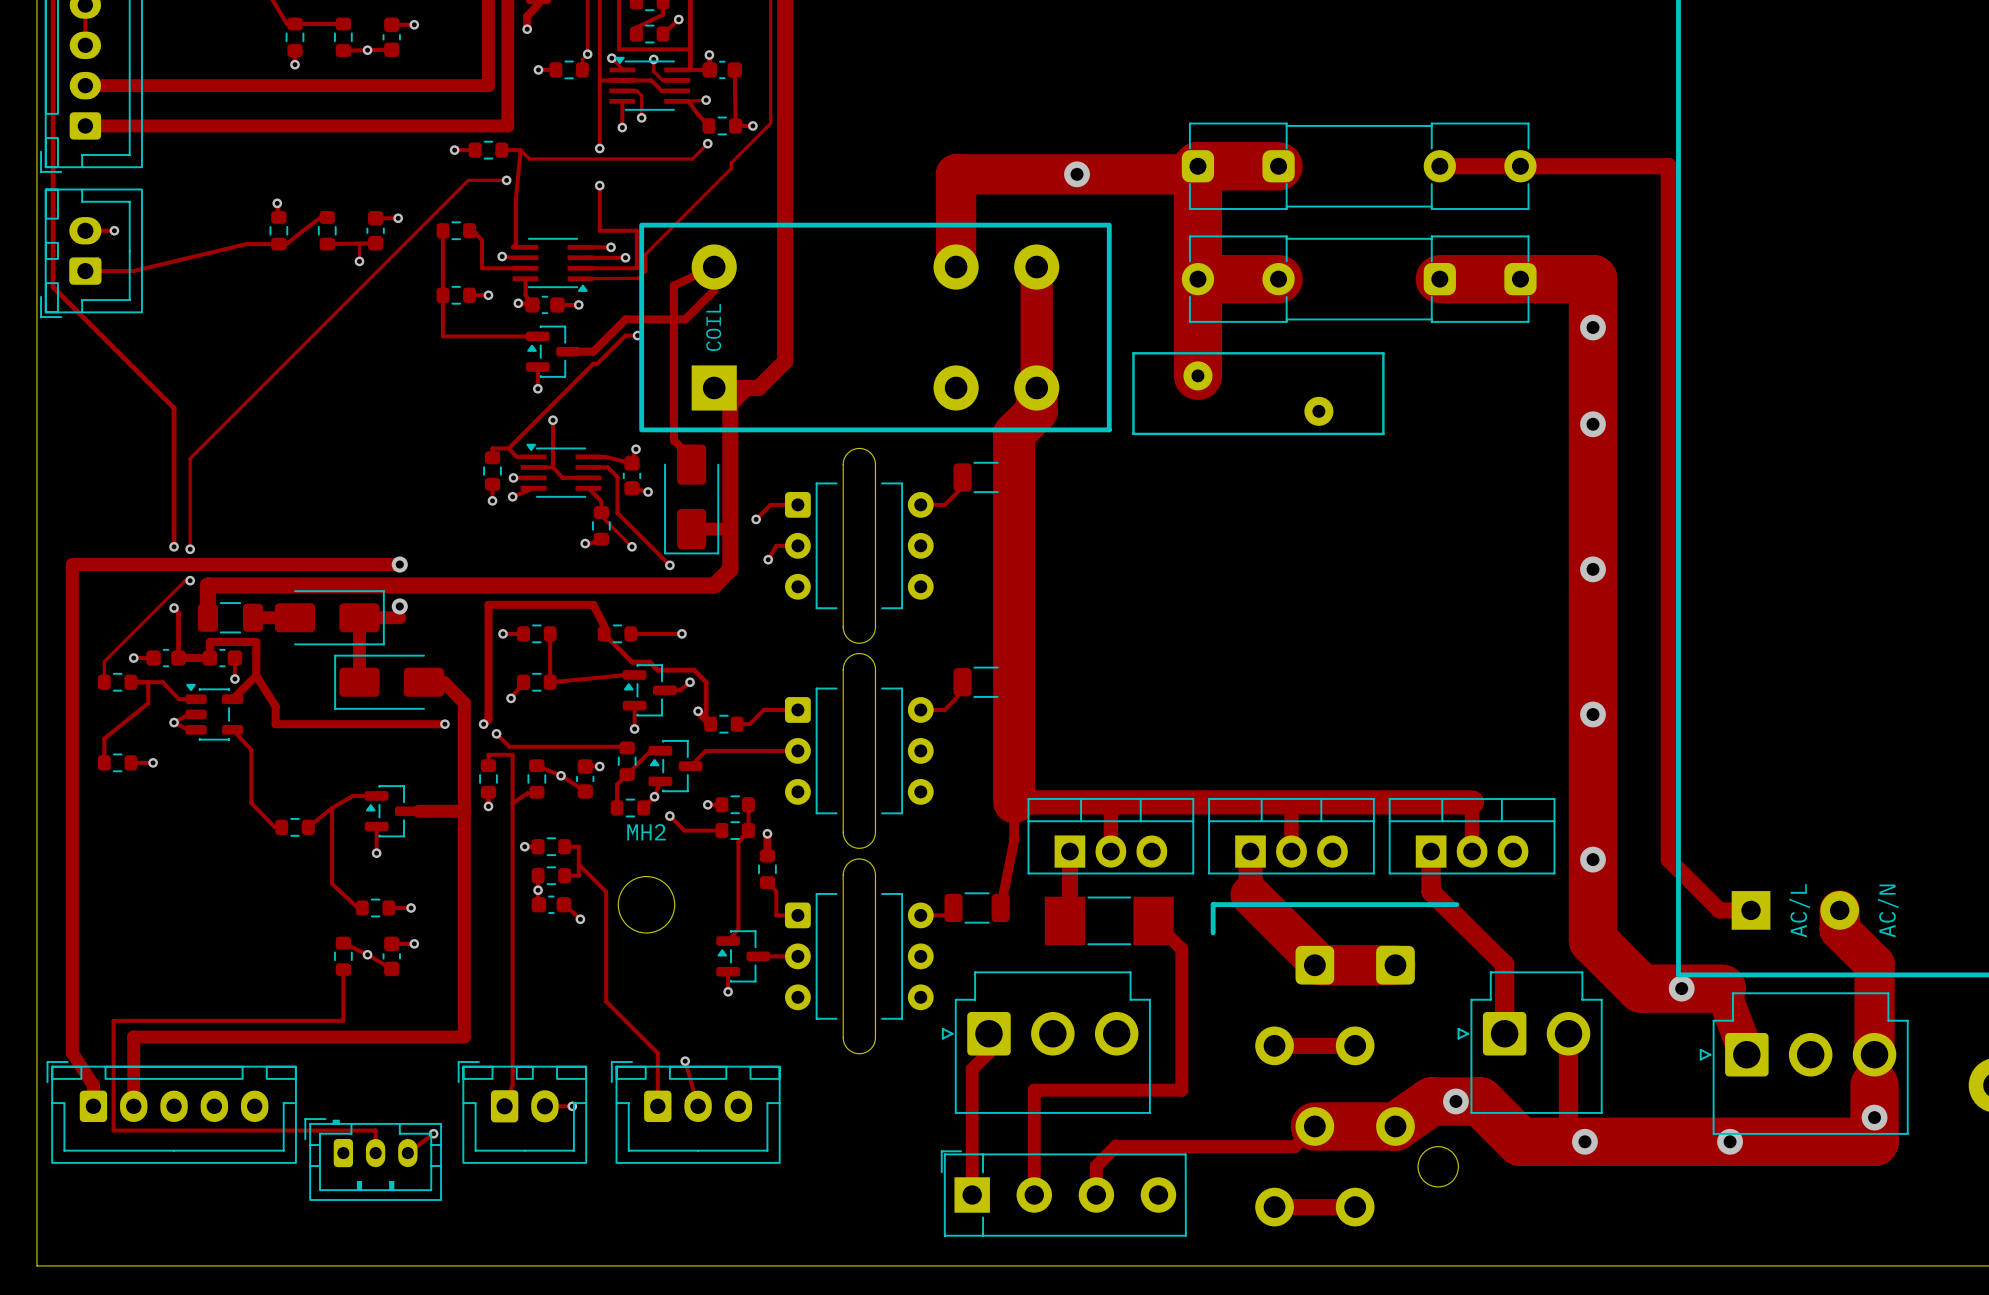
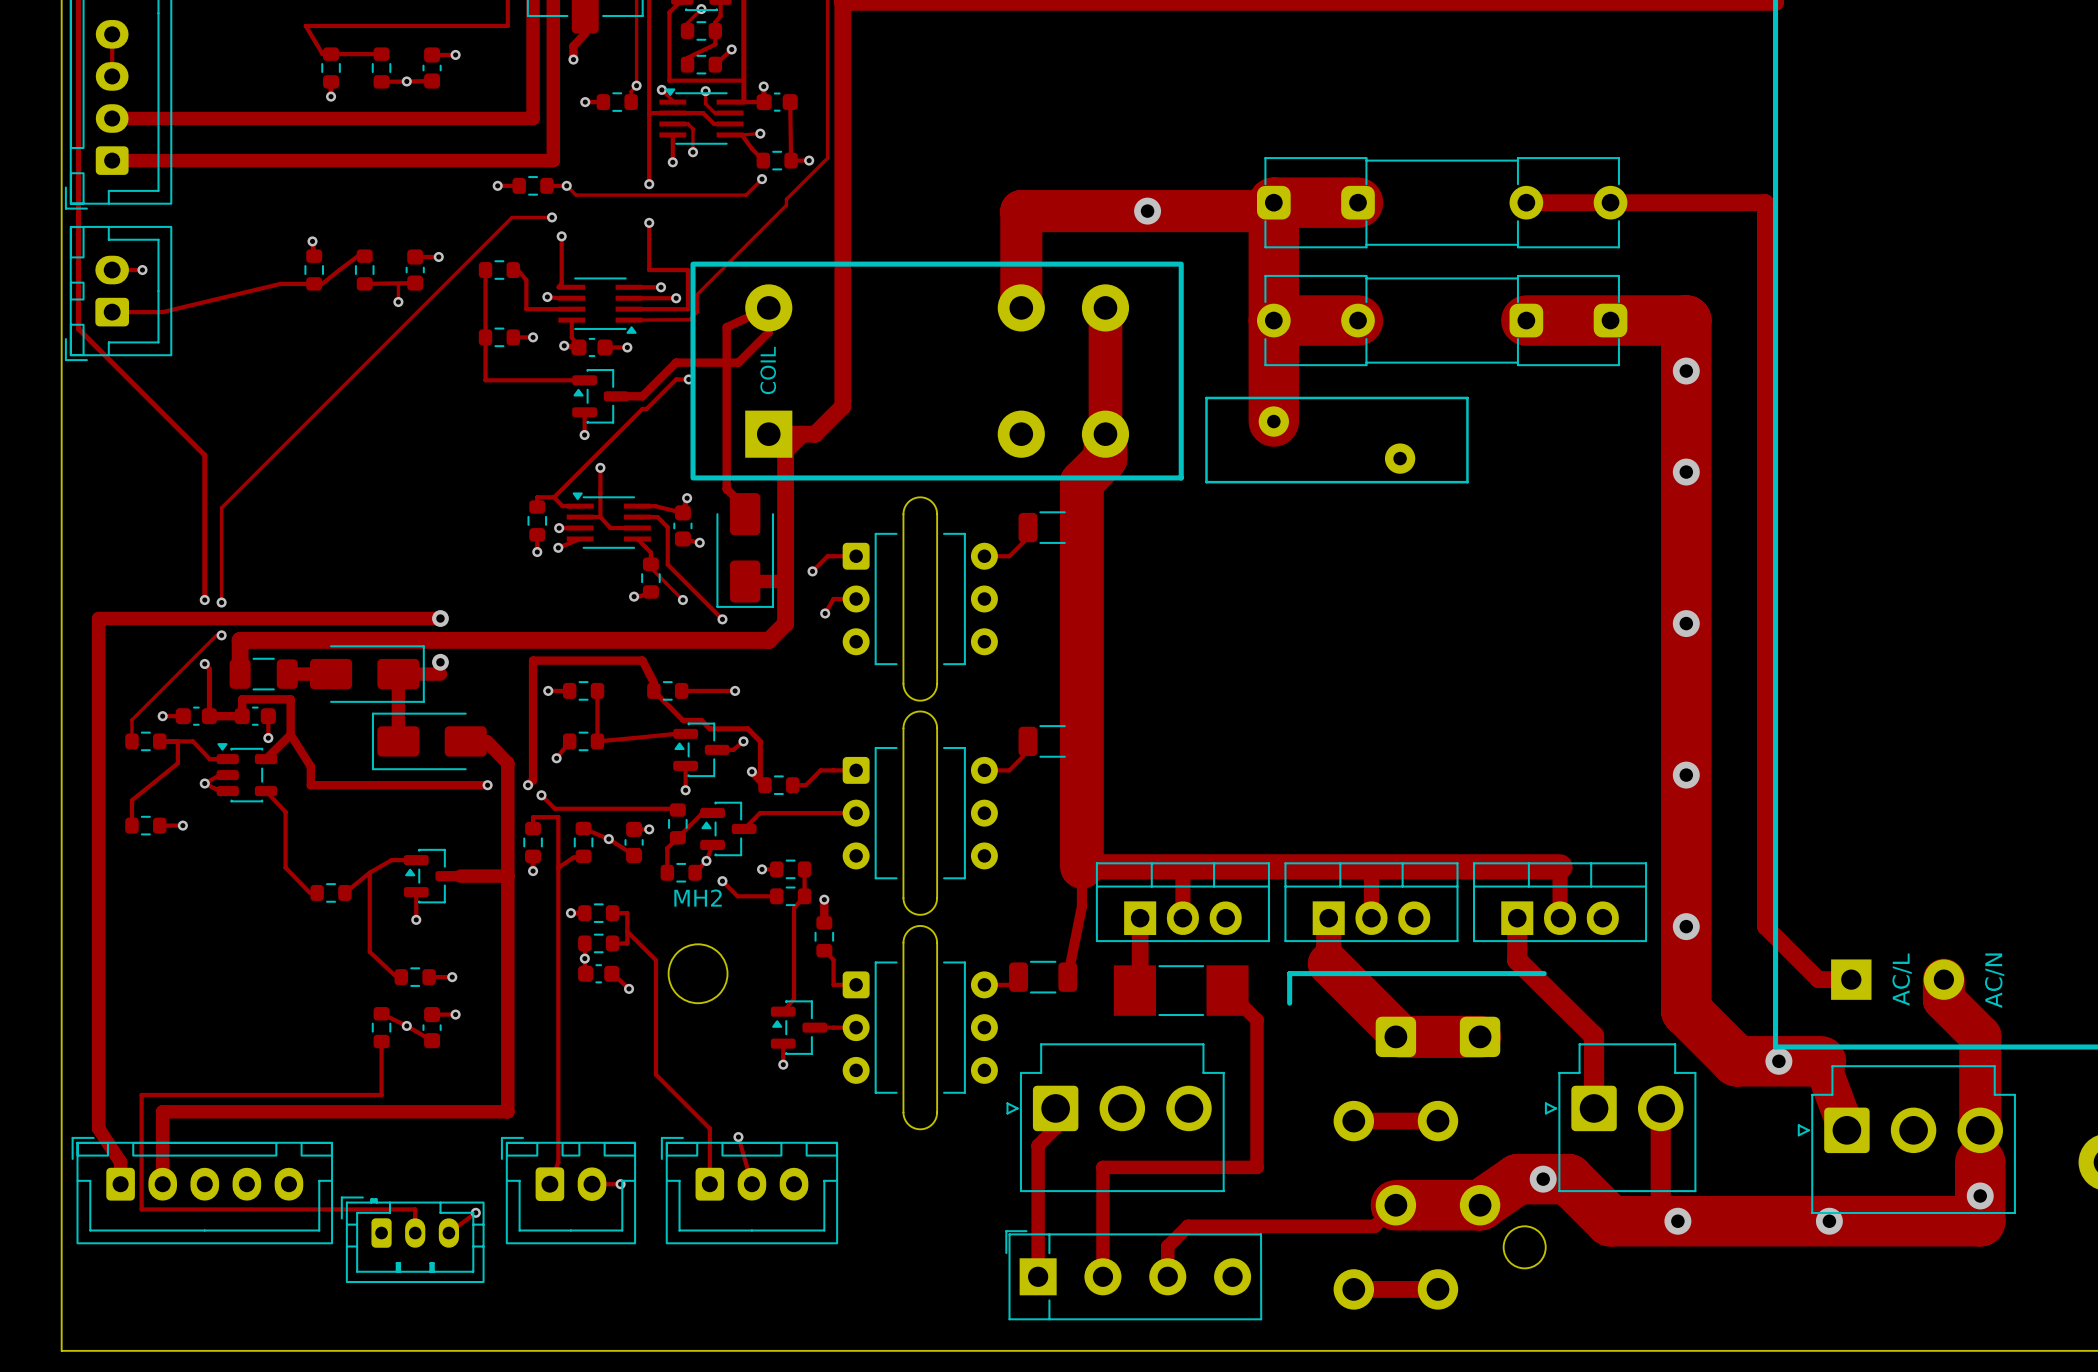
track: (520, 150) (515, 198) -> none
via: none -> (566, 185)
via: none -> (561, 236)

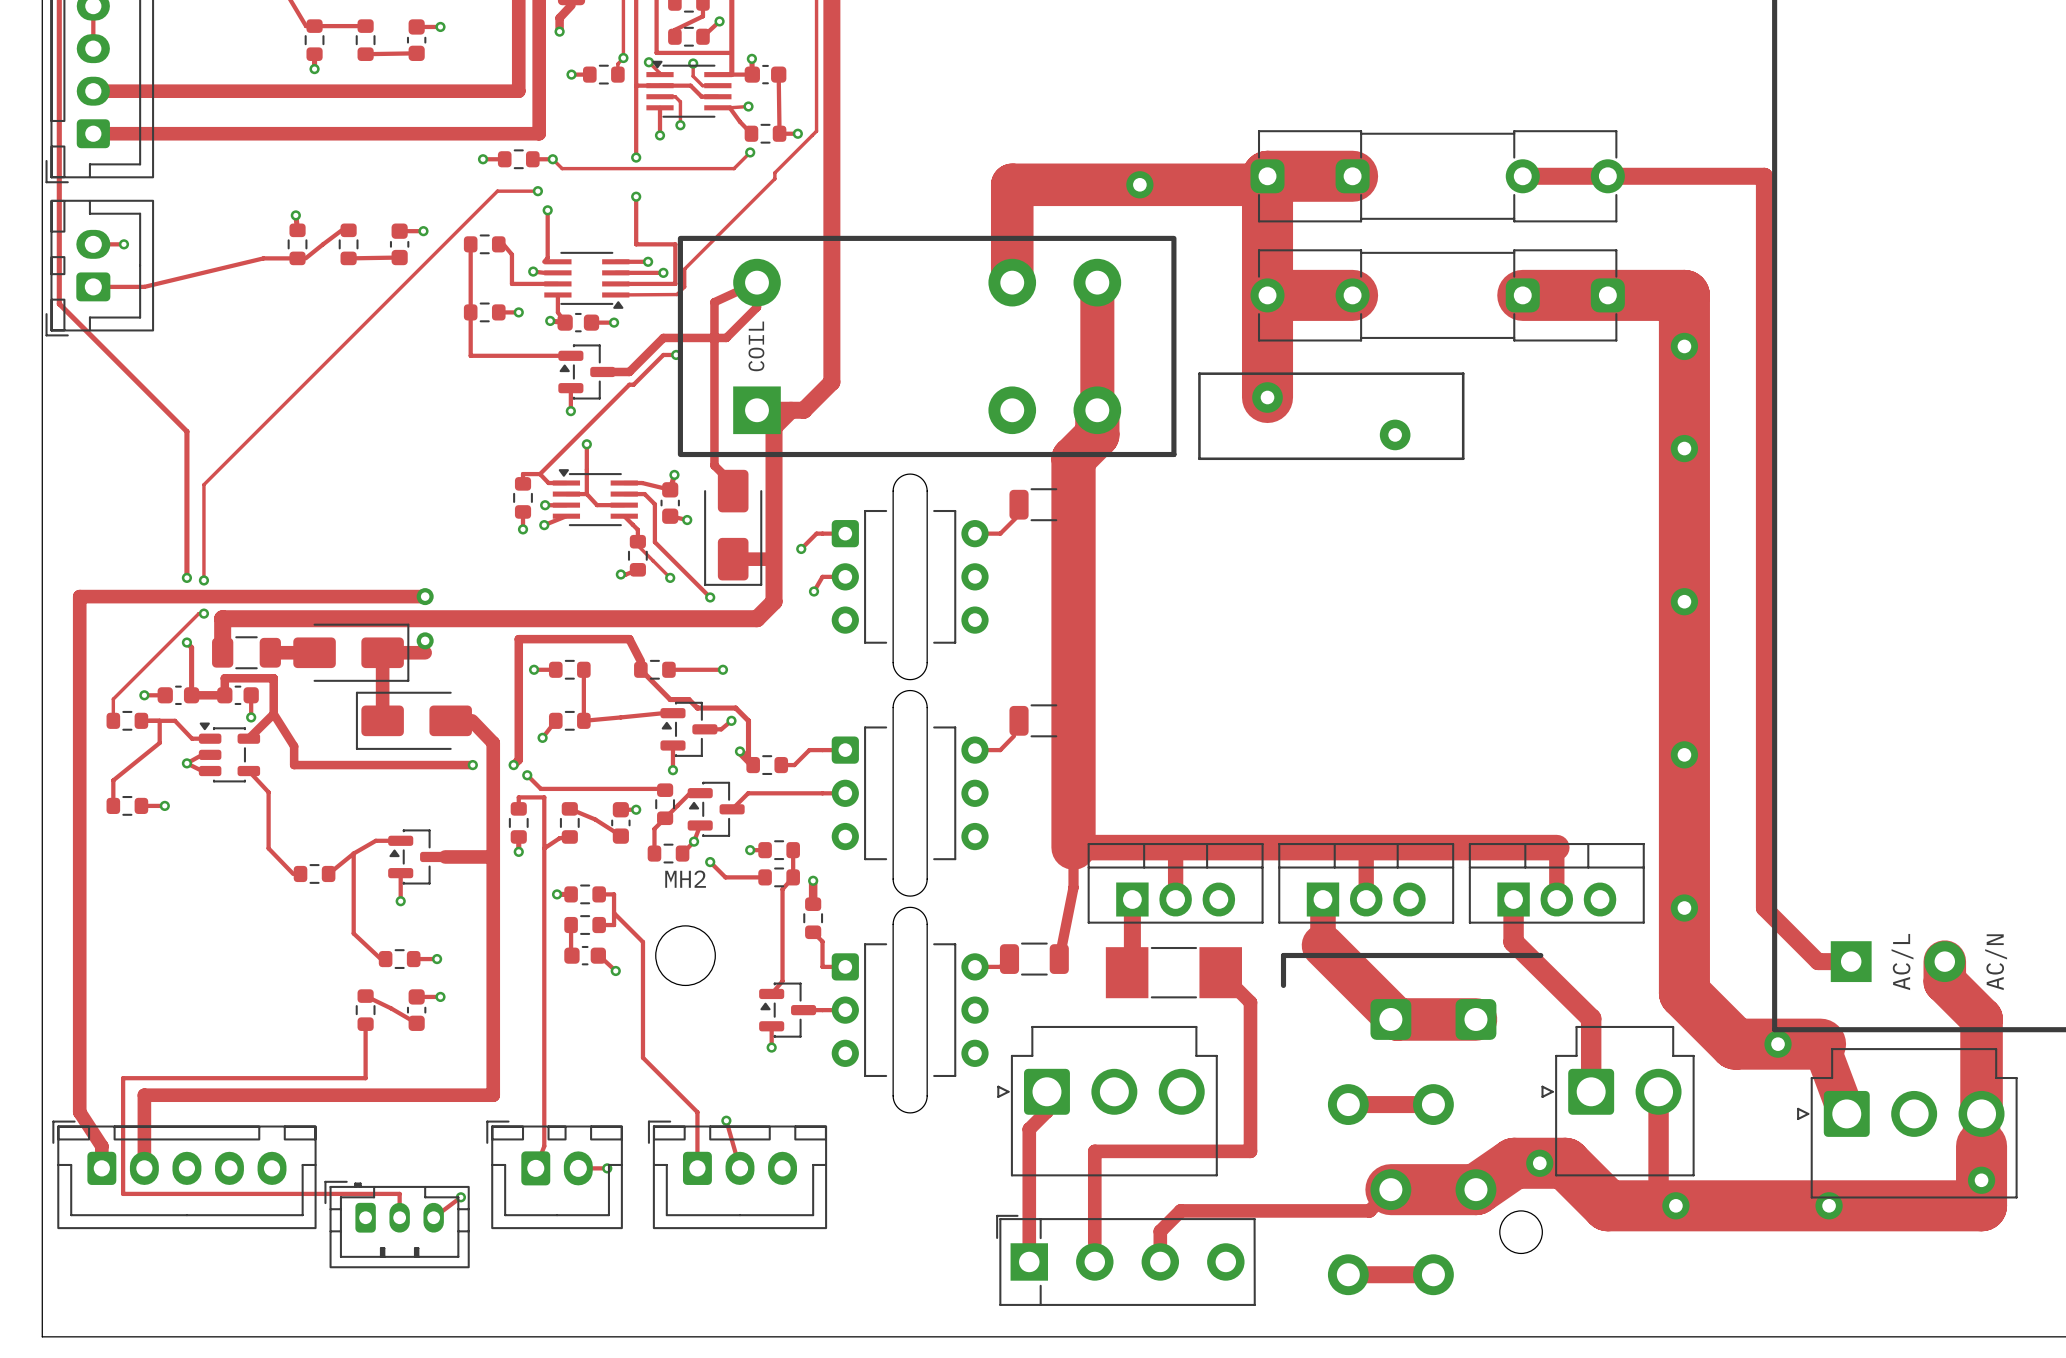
via: (406, 81) -> none
track: (398, 283) (398, 302) -> none
via: (398, 302) -> none
via: (608, 839) -> none
via: (584, 958) -> none
via: (406, 1025) -> none

